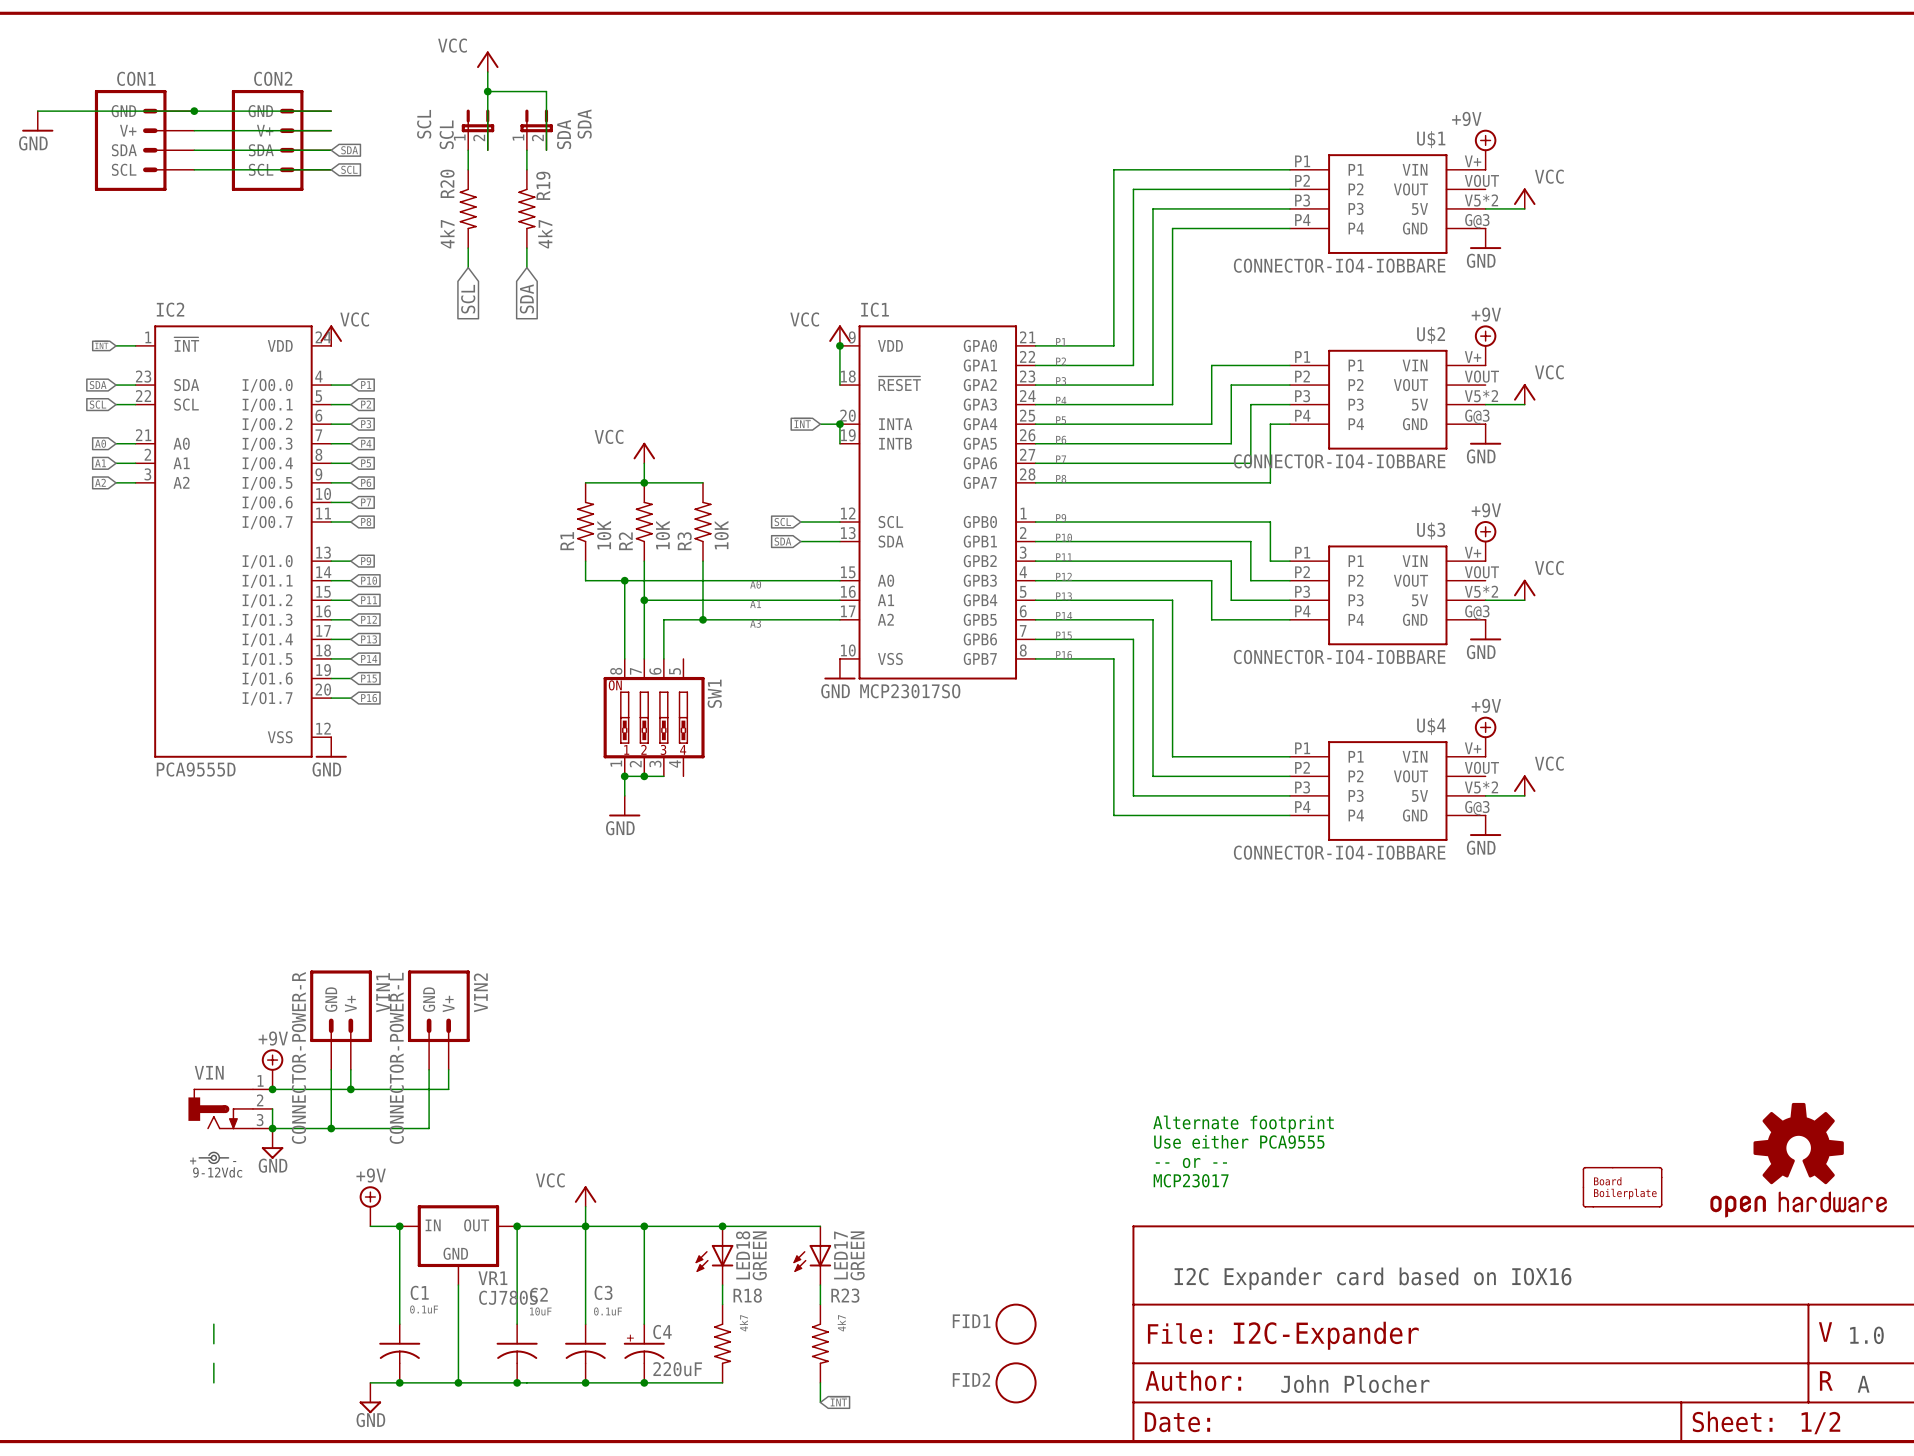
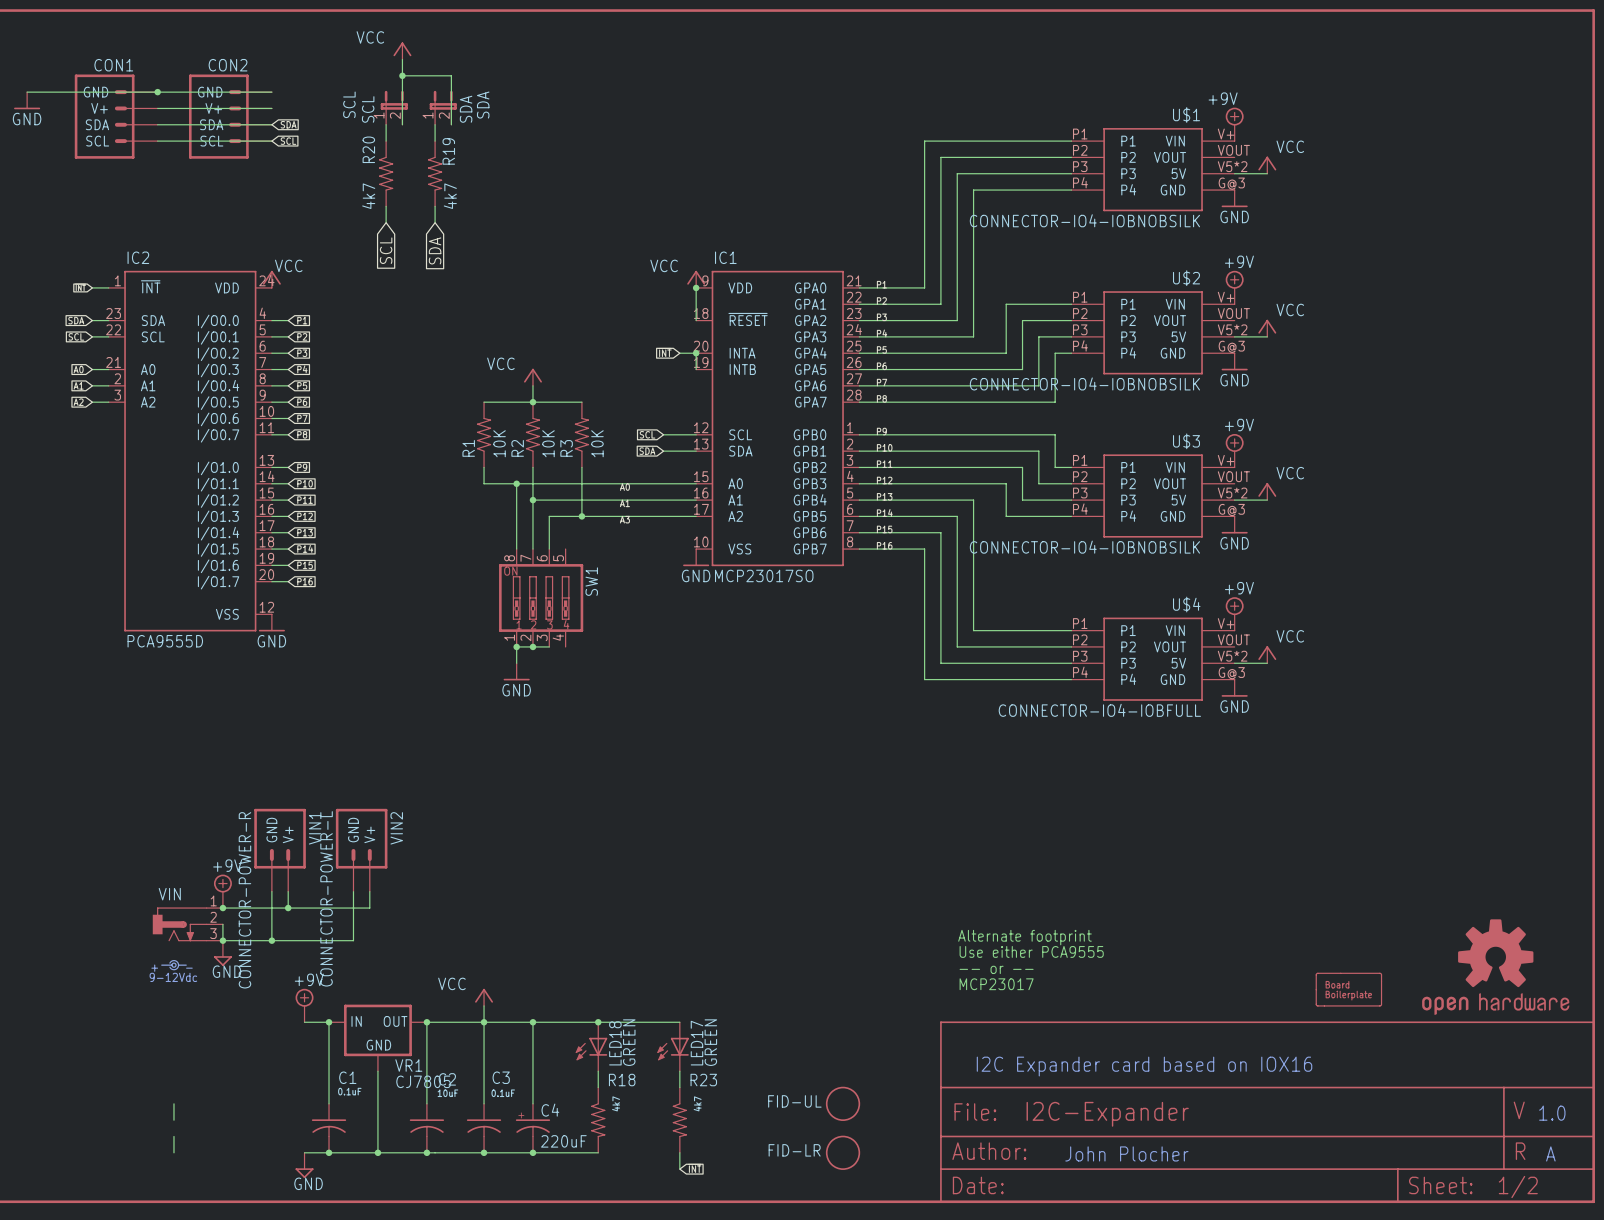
U$1 value: CONNECTOR-IO4-IOBBARE (1339, 265) -> CONNECTOR-IO4-IOBNOBSILK (1084, 220)
U$2 value: CONNECTOR-IO4-IOBBARE (1339, 461) -> CONNECTOR-IO4-IOBNOBSILK (1084, 383)
U$3 value: CONNECTOR-IO4-IOBBARE (1339, 657) -> CONNECTOR-IO4-IOBNOBSILK (1084, 547)
U$4 value: CONNECTOR-IO4-IOBBARE (1339, 852) -> CONNECTOR-IO4-IOBFULL (1099, 710)
FID1 name: FID1 (971, 1321) -> FID-UL (794, 1101)
FID2 name: FID2 (971, 1379) -> FID-LR (794, 1150)

